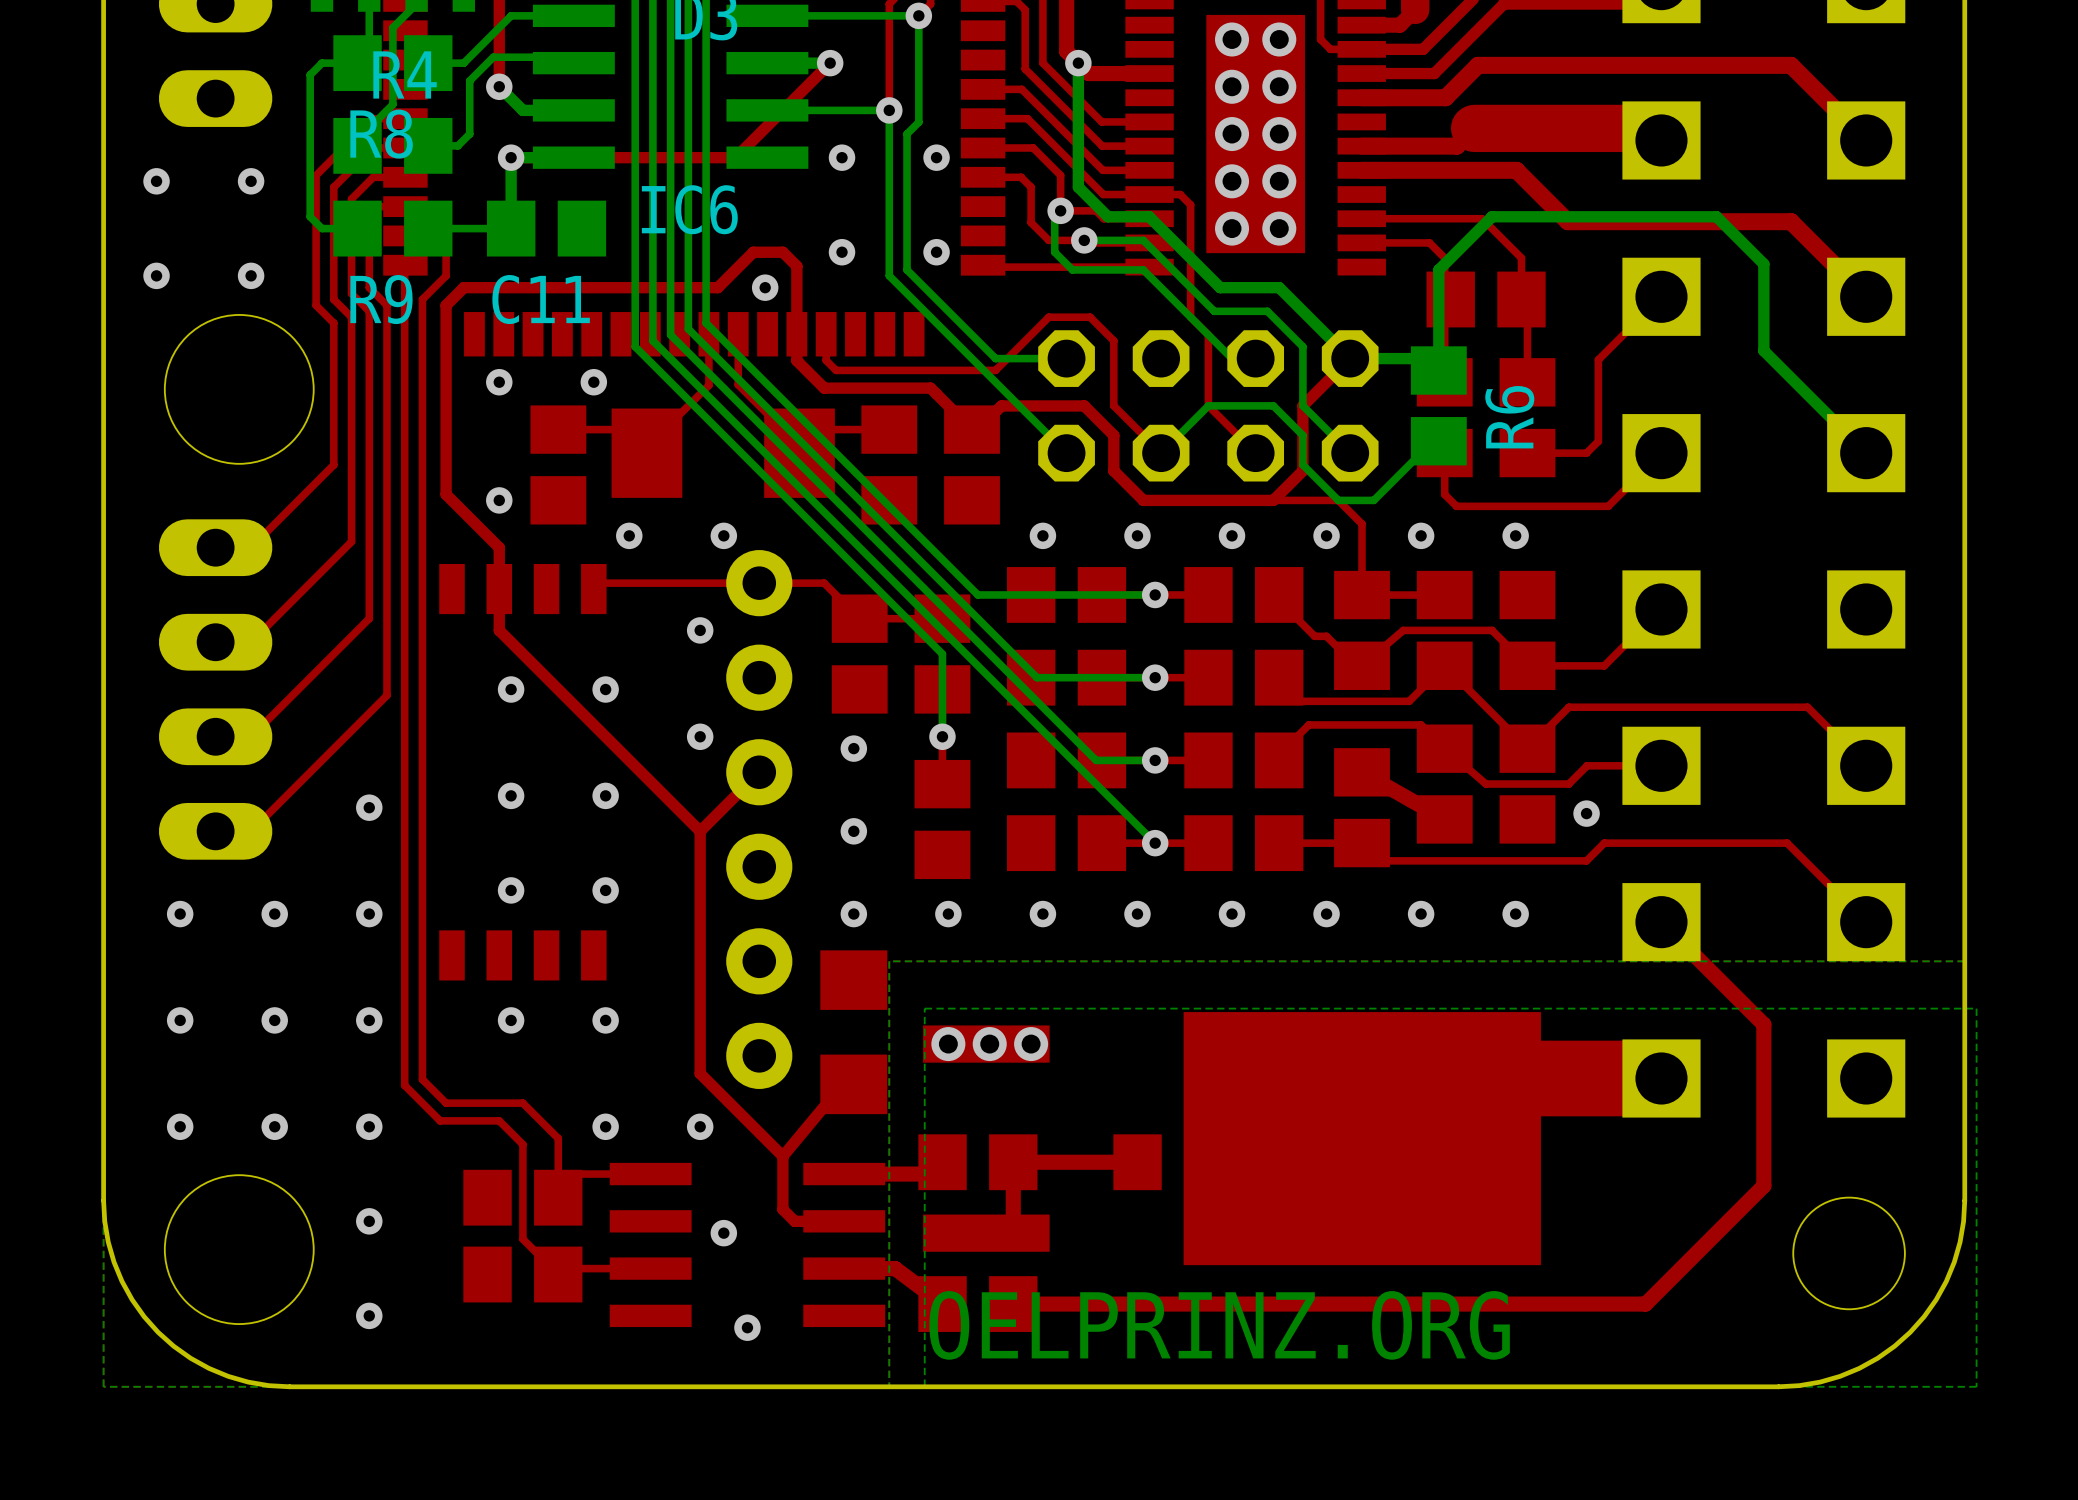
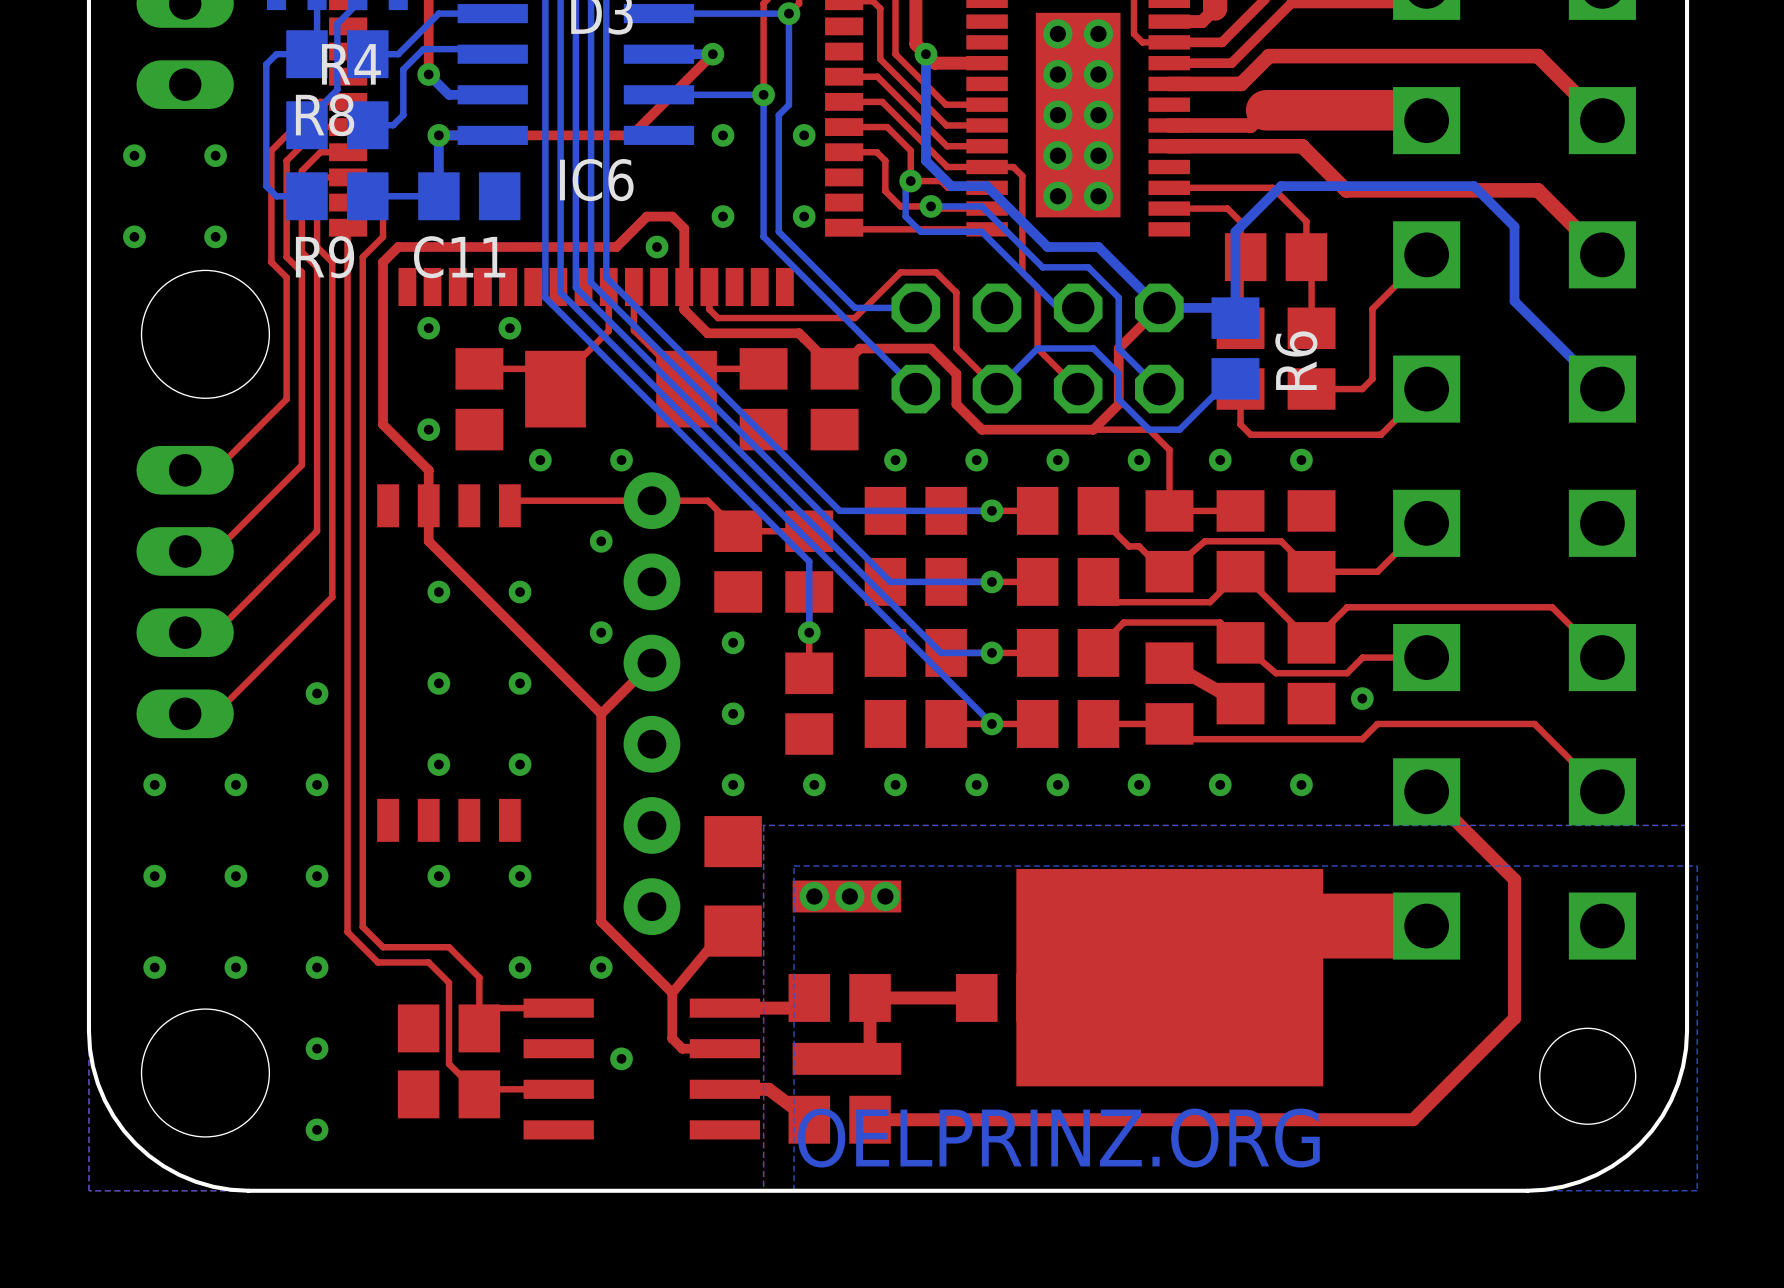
via: (747, 1327) -> none

